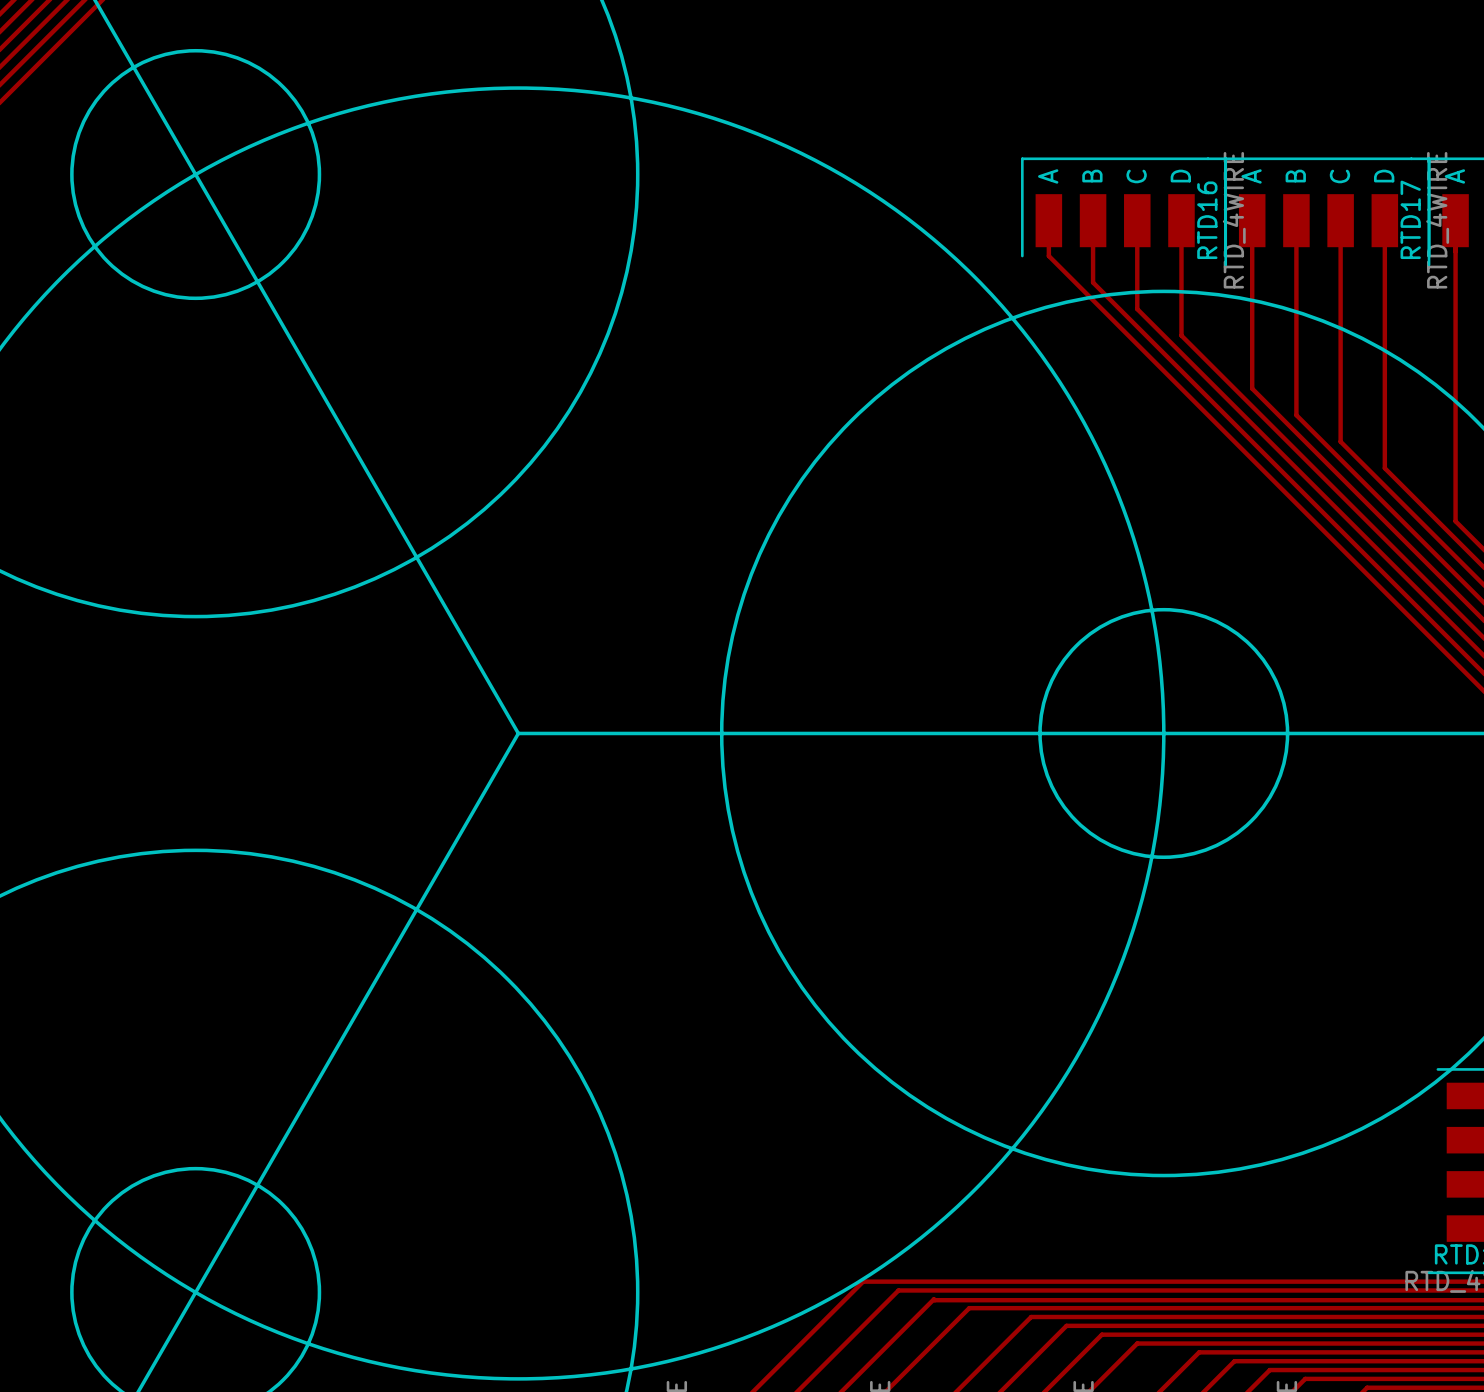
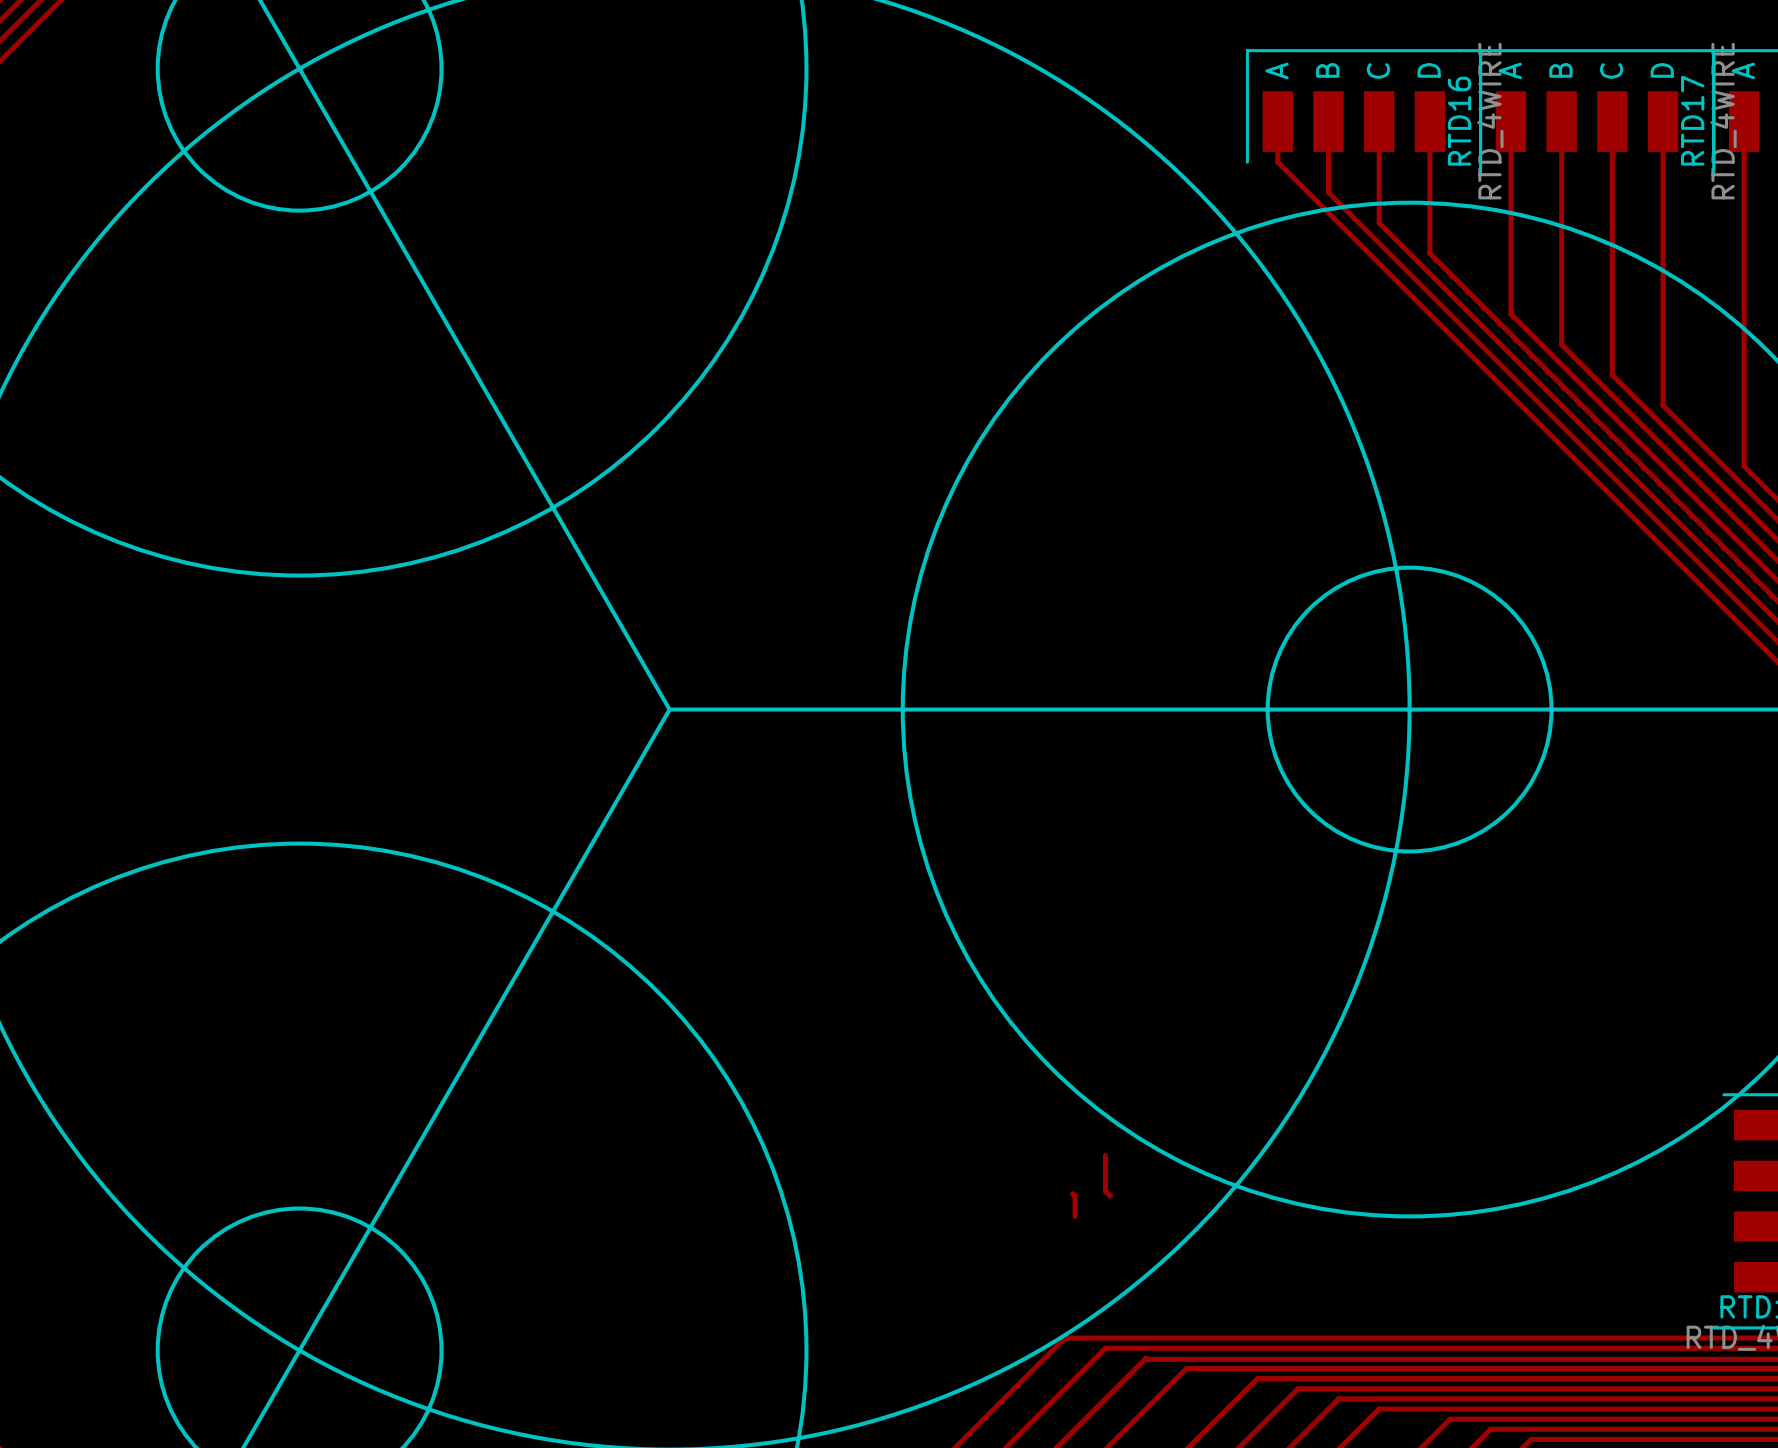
track: none -> (1105, 1155) (1105, 1191) (1110, 1196)
track: none -> (1072, 1193) (1075, 1196) (1075, 1216)

